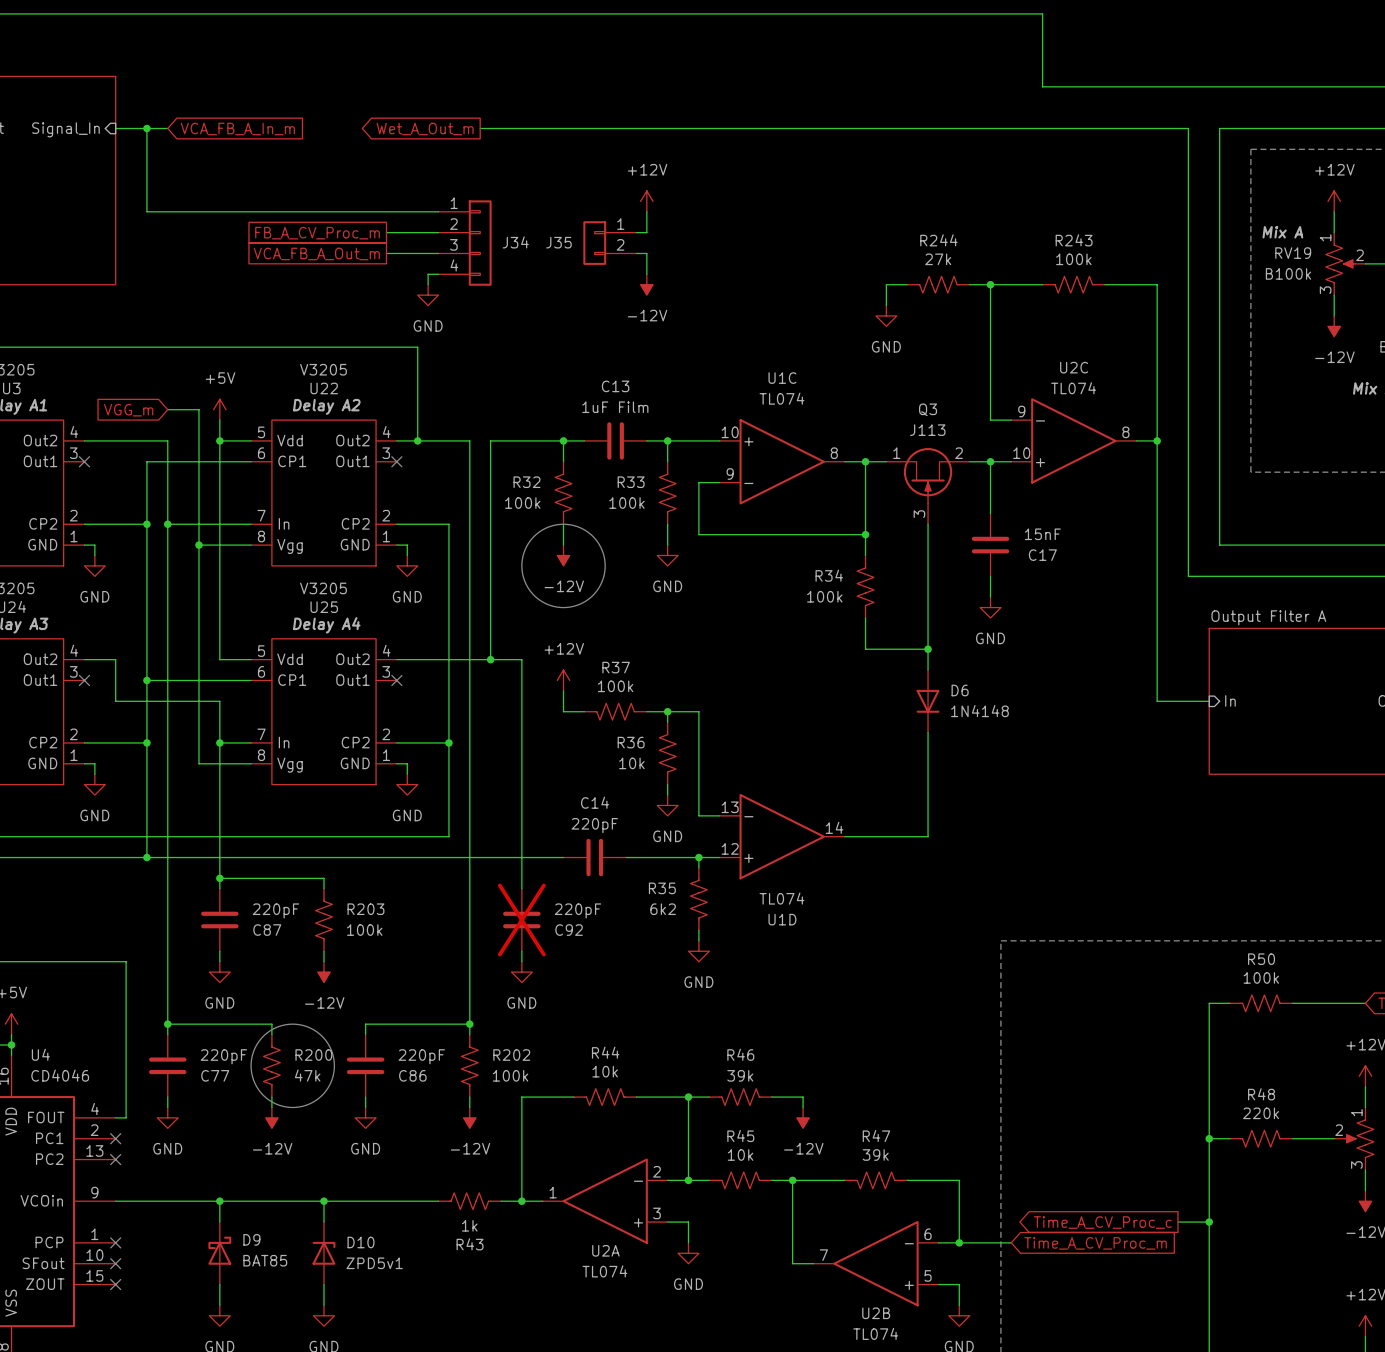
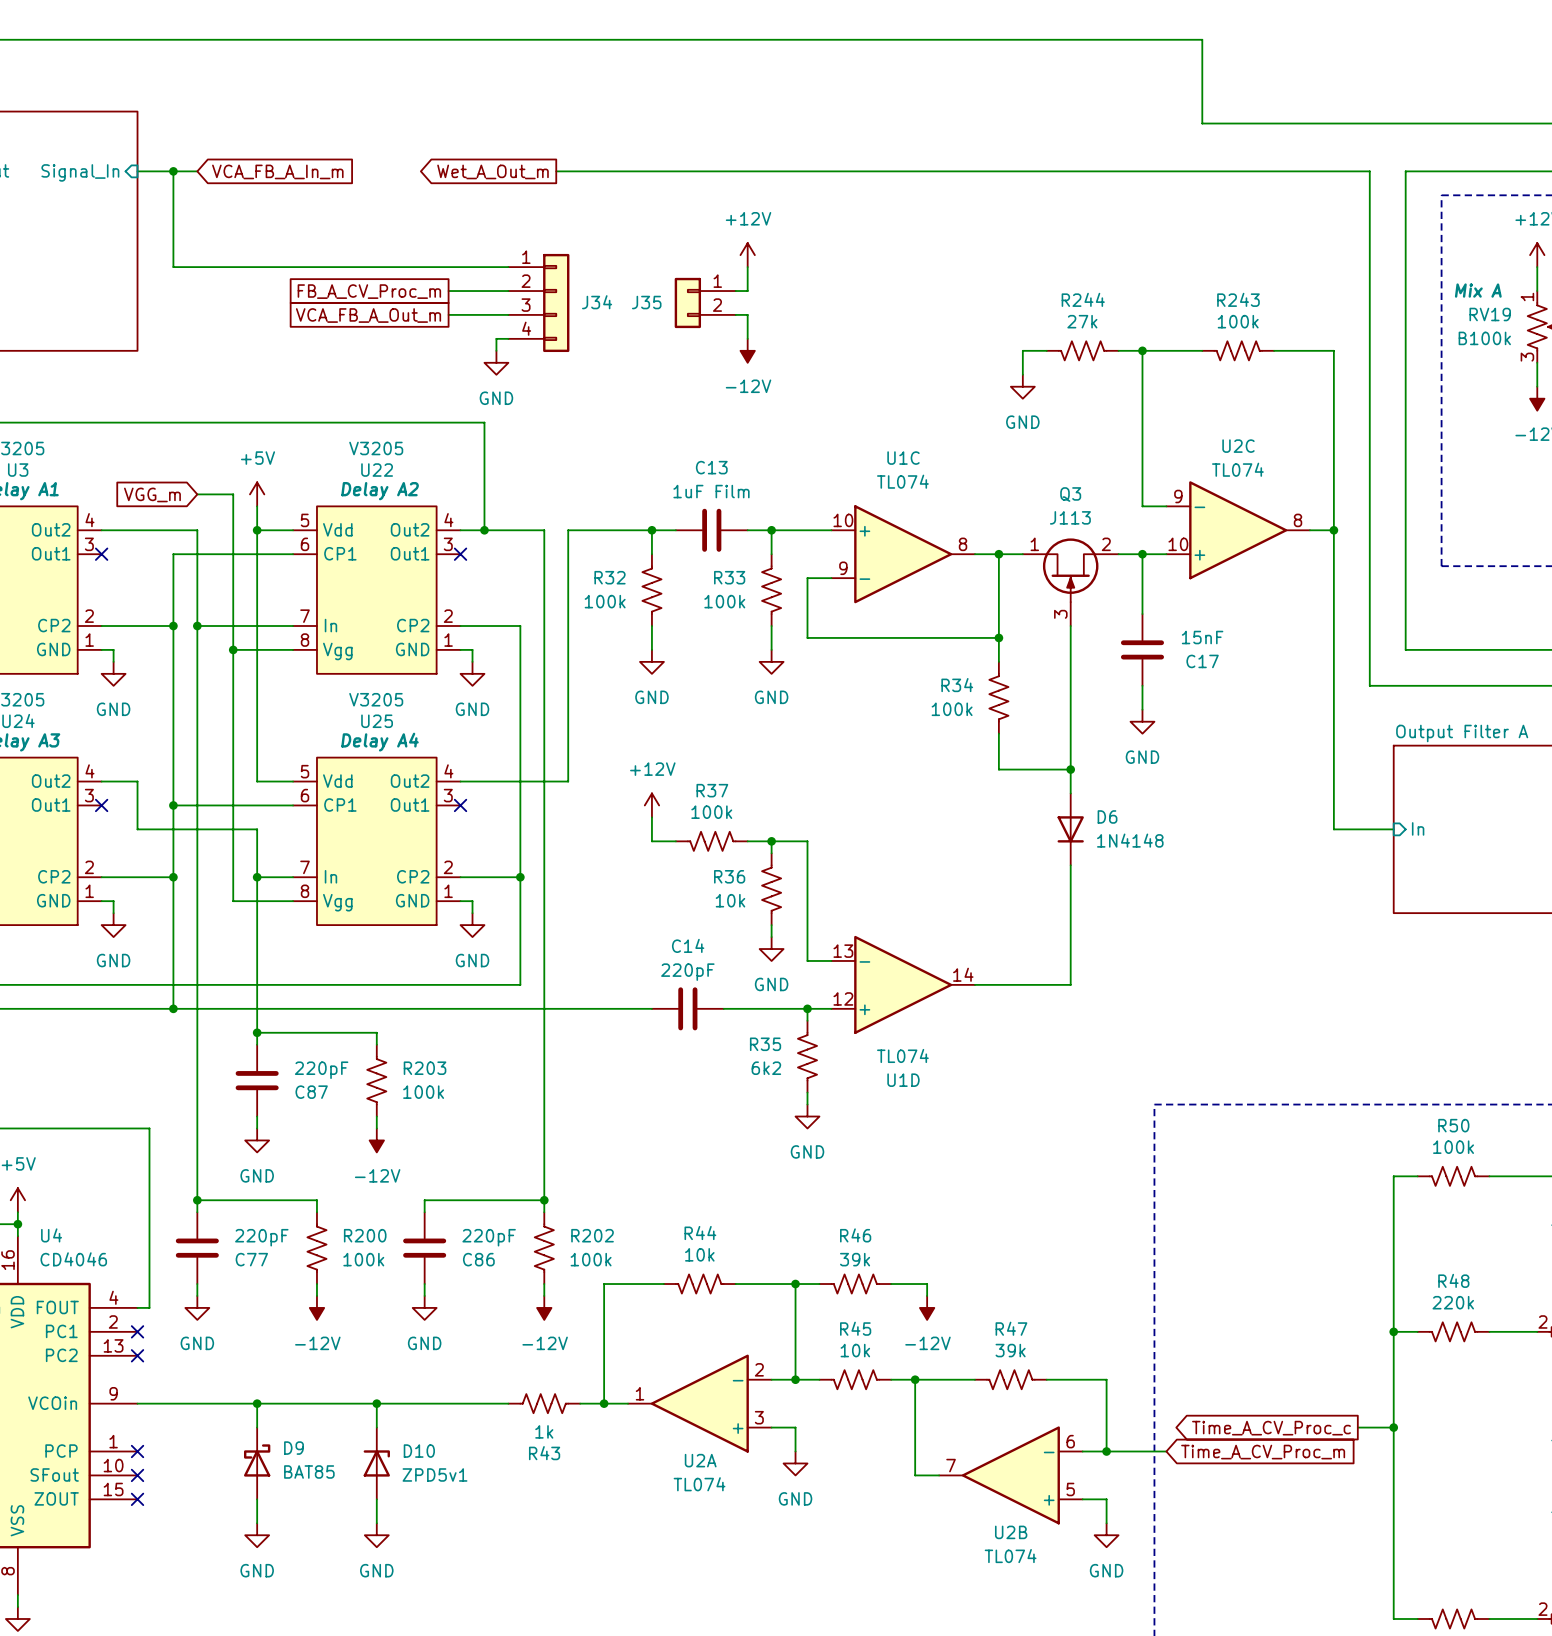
drawing: [521, 524, 606, 608] -> none
power symbol: -12V (563, 555) -> GND (651, 661)
wire: (490, 659) (521, 659) (521, 888) -> none
junction: (490, 659) -> none
C92: 220pF (521, 920) -> none
wire: (521, 951) (521, 961) -> none
power symbol: GND (521, 972) -> none
drawing: [251, 1024, 335, 1108] -> none
R200 value: 47k (307, 1075) -> 100k (363, 1259)

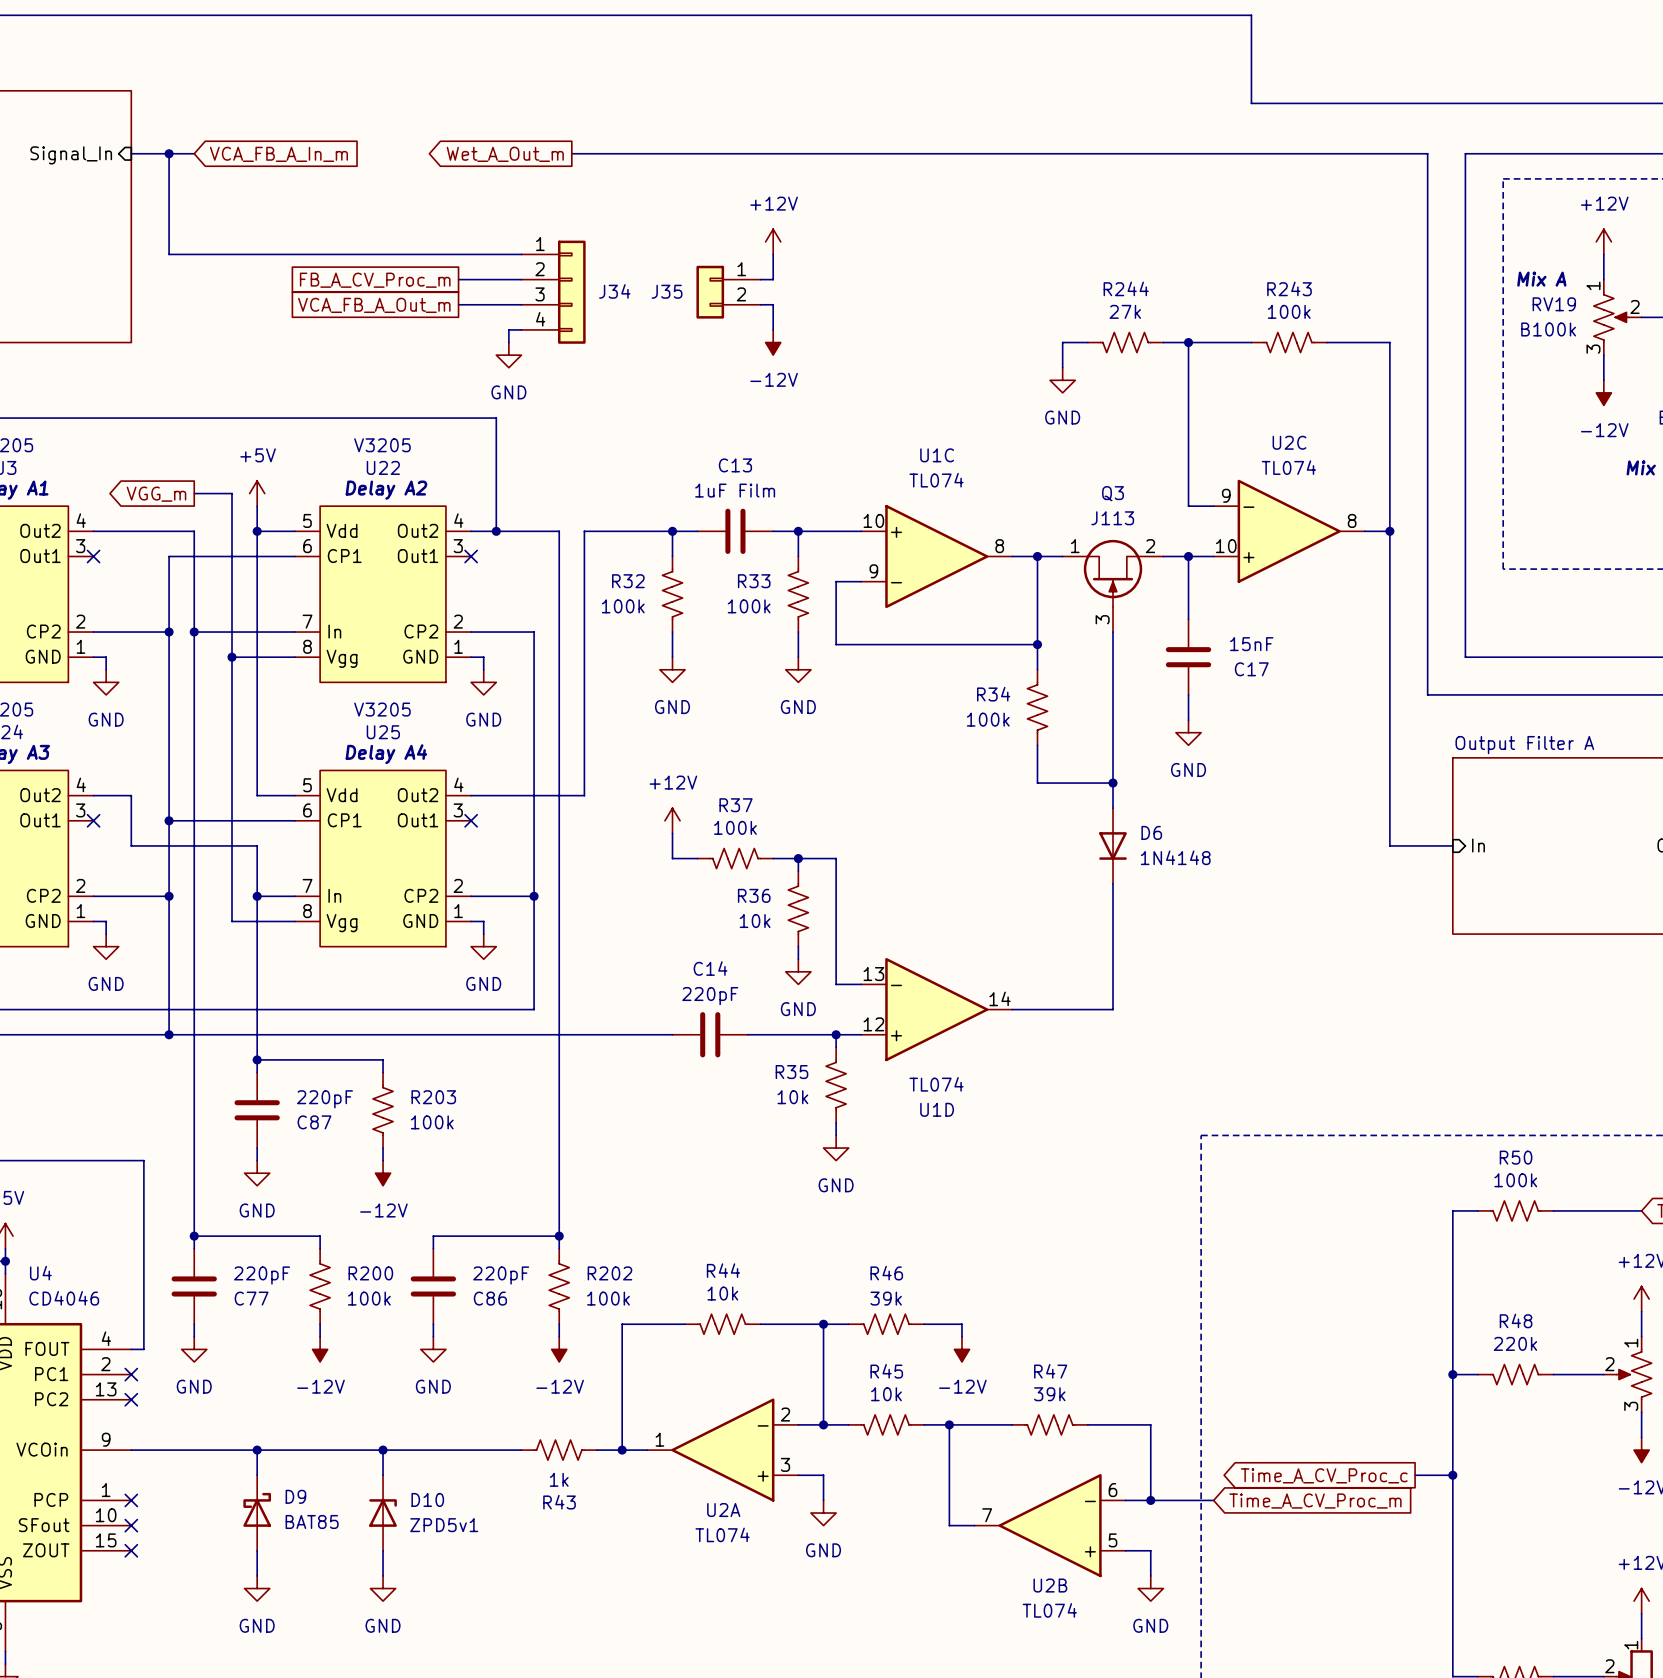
global label shape: input (152, 494) -> output (156, 494)
R35 value: 6k2 (766, 1068) -> 10k (792, 1097)

